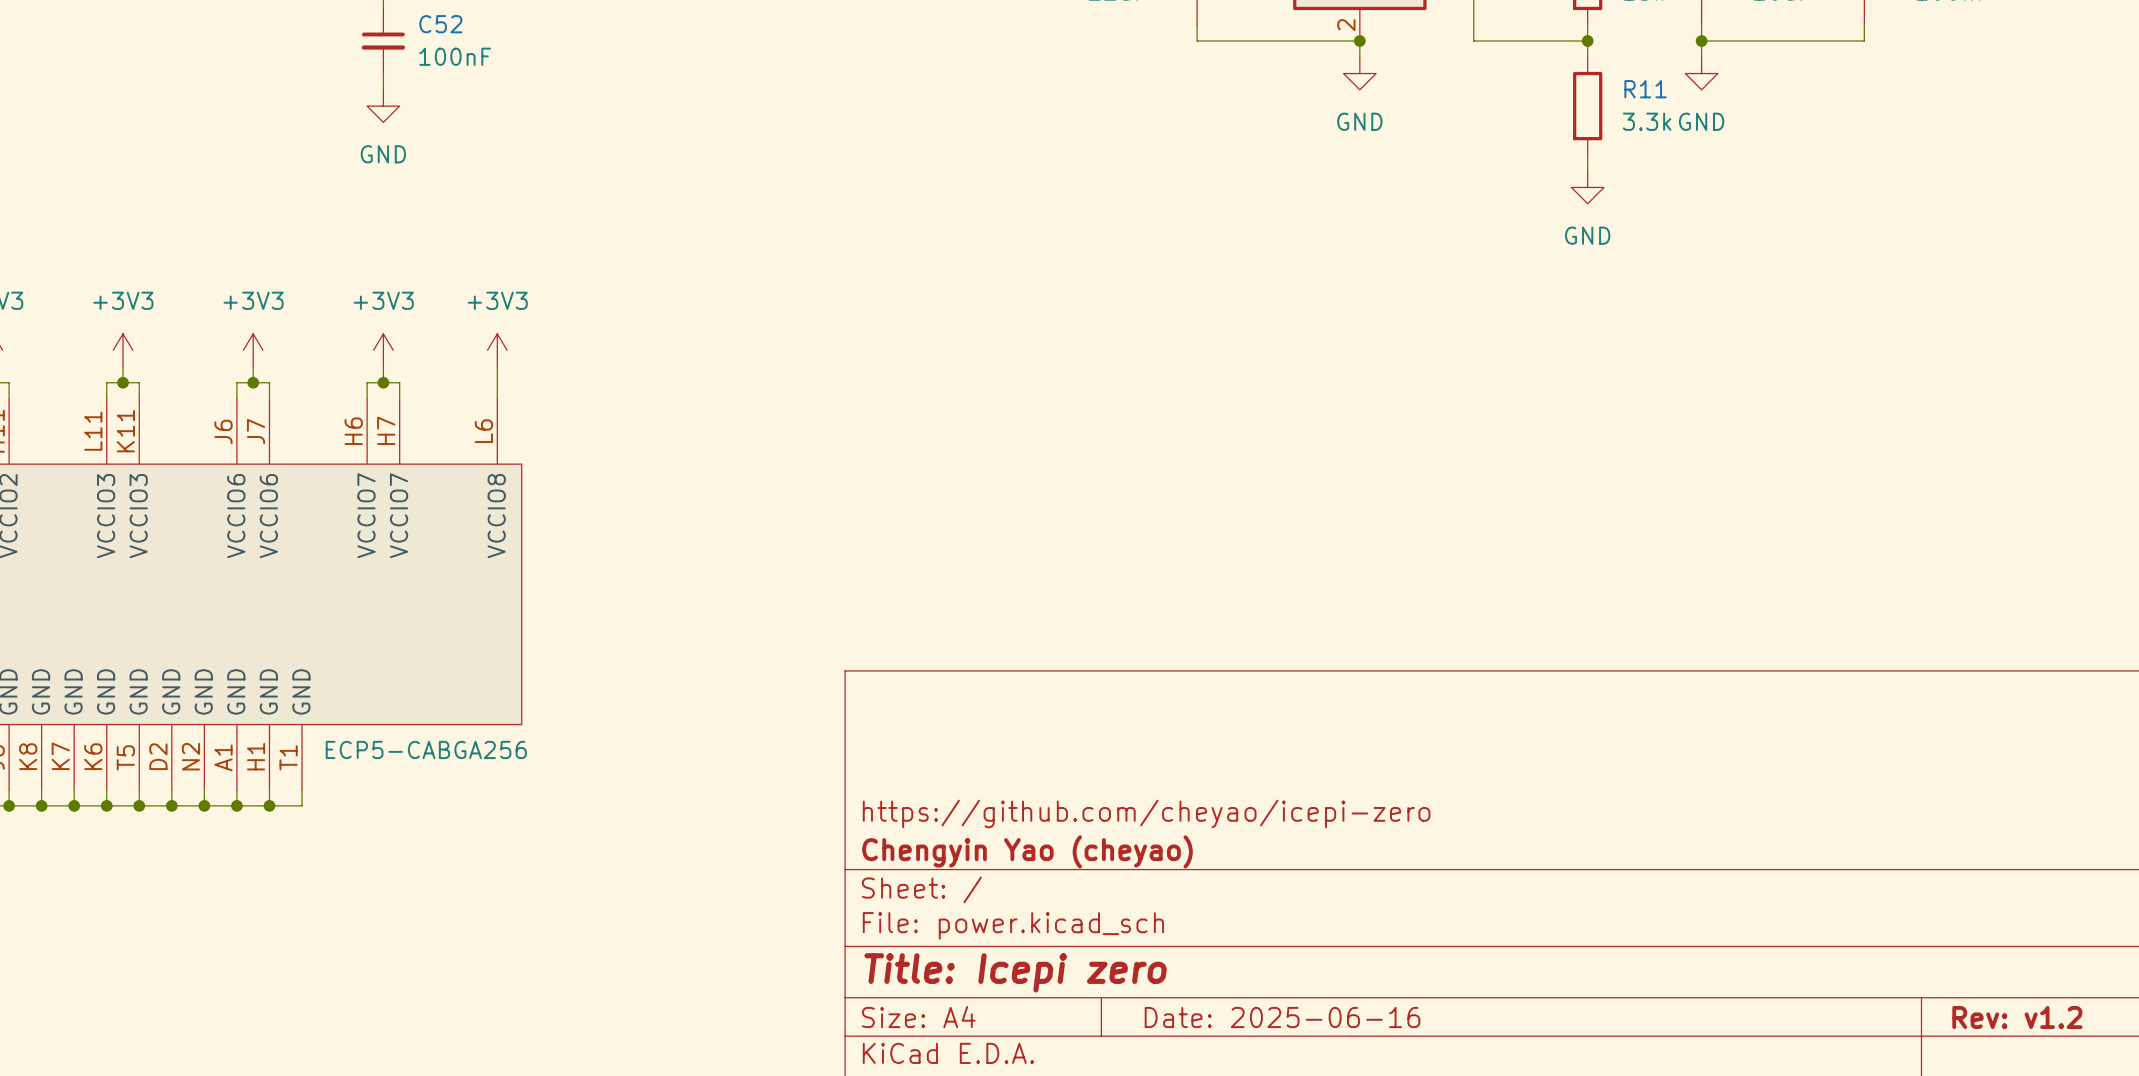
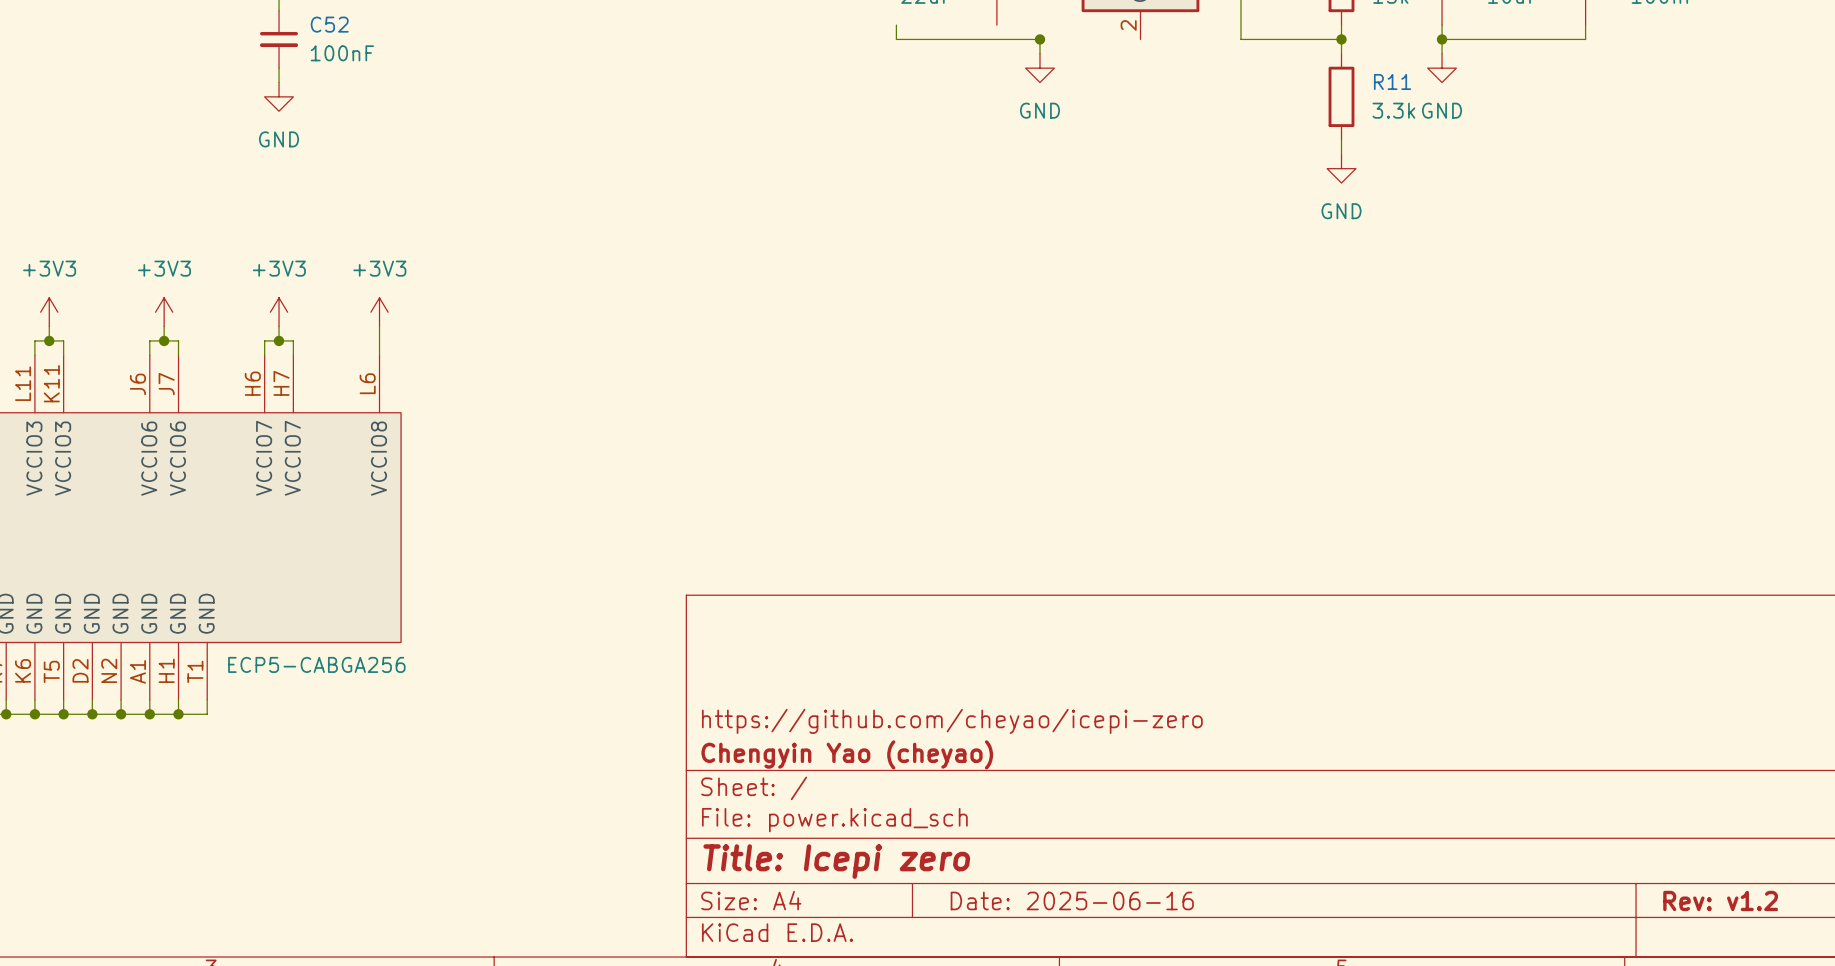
wire: (1197, 24) (1197, 41) -> (896, 25) (896, 39) (996, 39)
wire: (1245, 41) (1359, 41) (1359, 57) -> (1039, 39) (1039, 53)
junction: none -> (1039, 39)
junction: (1359, 41) -> none
power symbol position: GND (1359, 73) -> GND (1039, 68)

